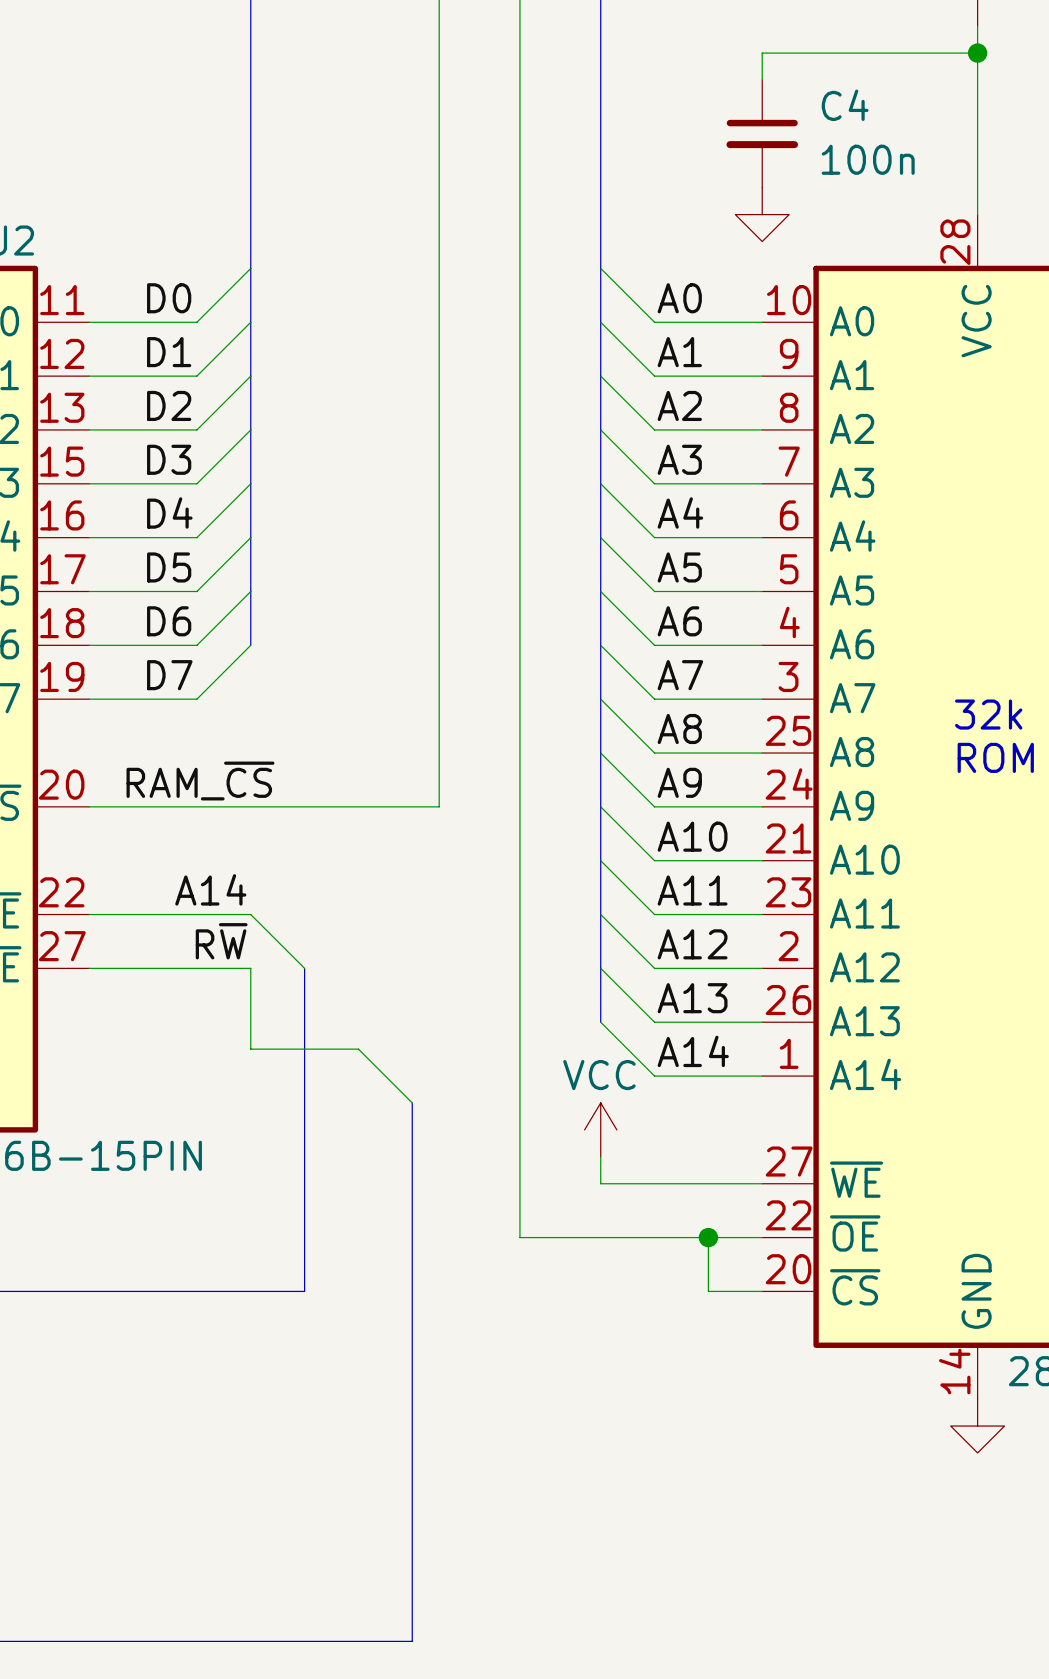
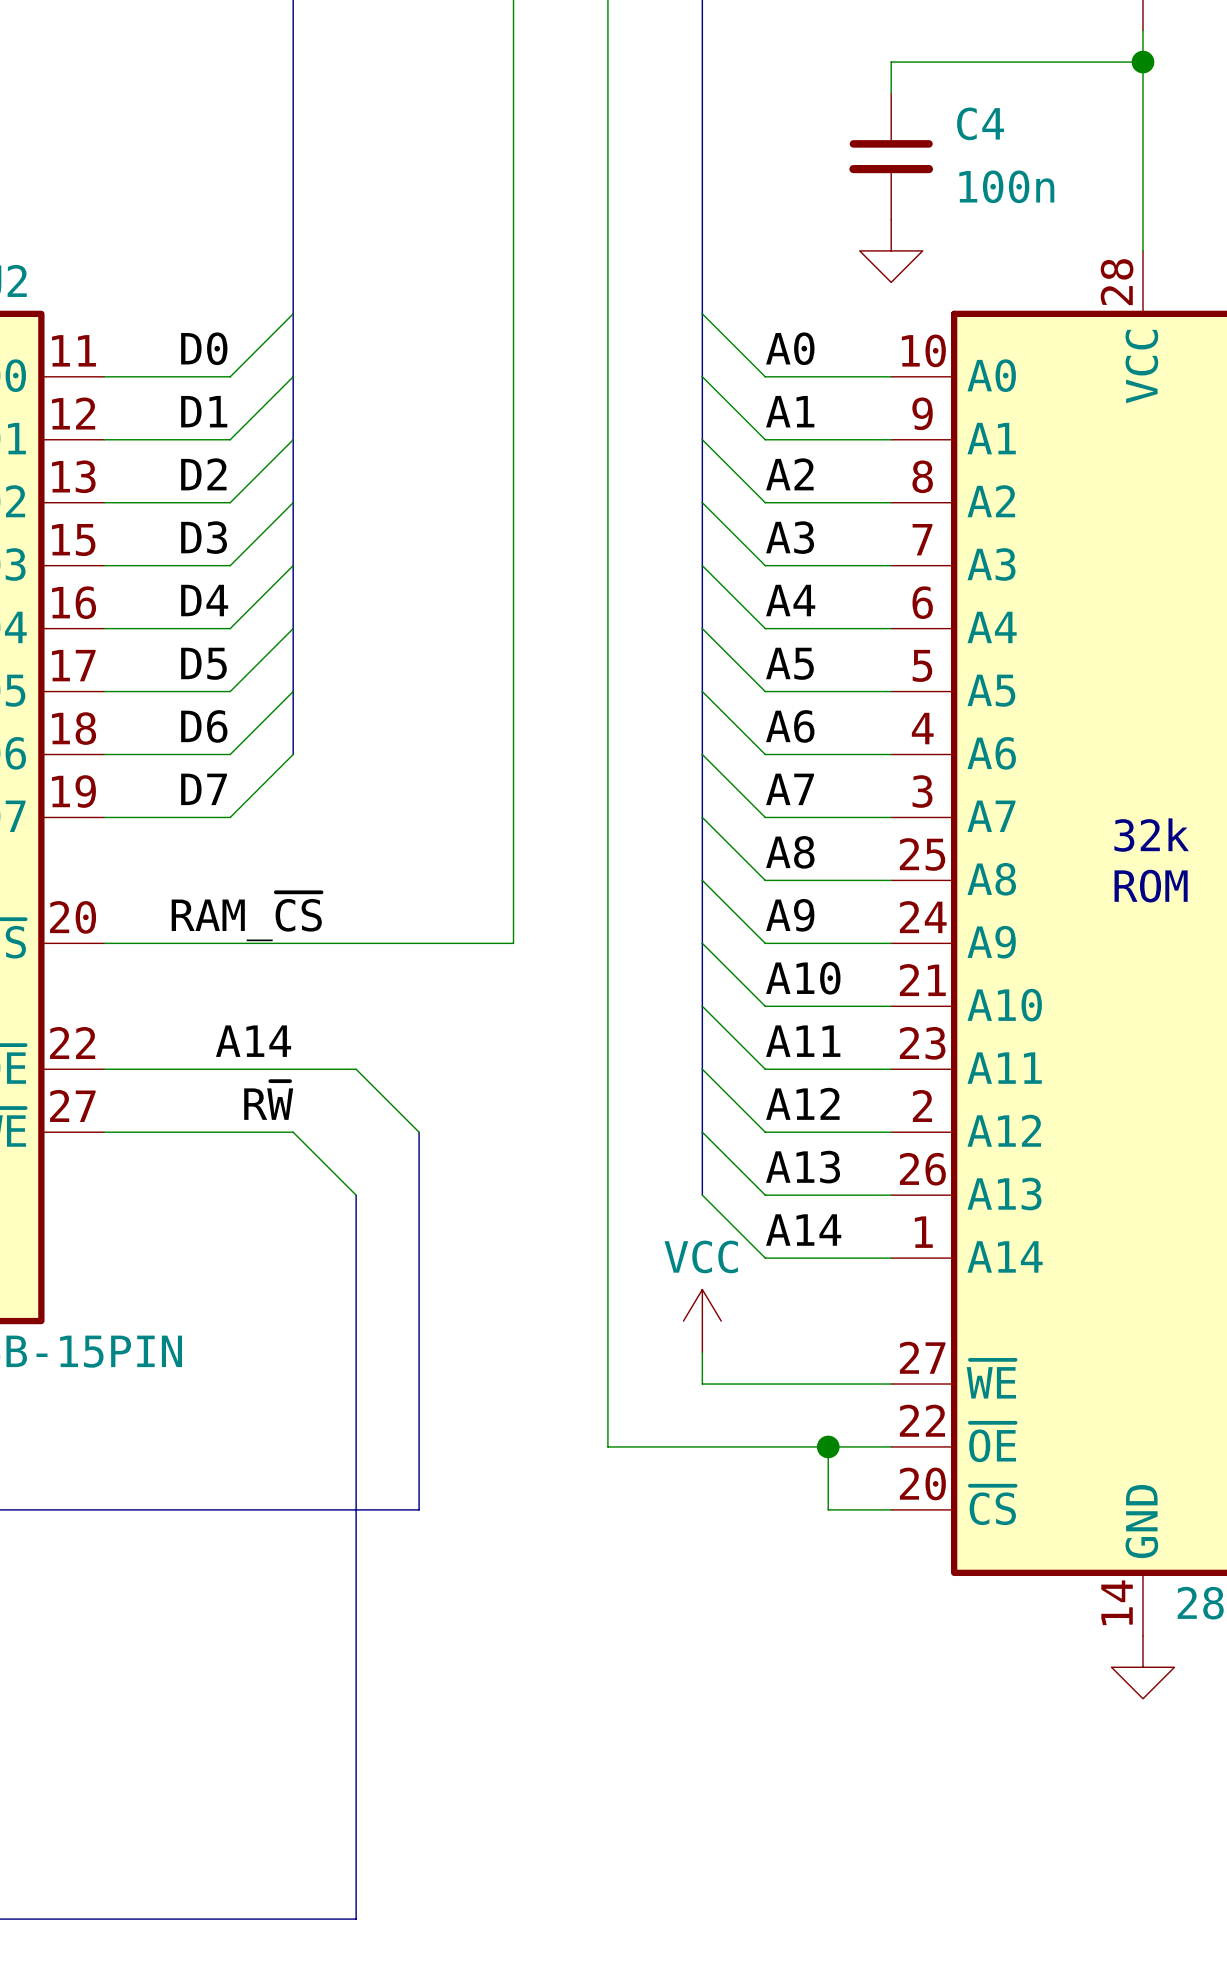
wire: (250, 914) (304, 968) -> (293, 1069) (356, 1069) (419, 1132)
wire: (250, 968) (250, 1049) (358, 1049) (412, 1102) -> (293, 1132) (356, 1195)
bus: (304, 968) (304, 1022) -> none
bus: (412, 1102) (412, 1641) (304, 1641) -> (419, 1132) (419, 1509) (356, 1509) (356, 1919)

